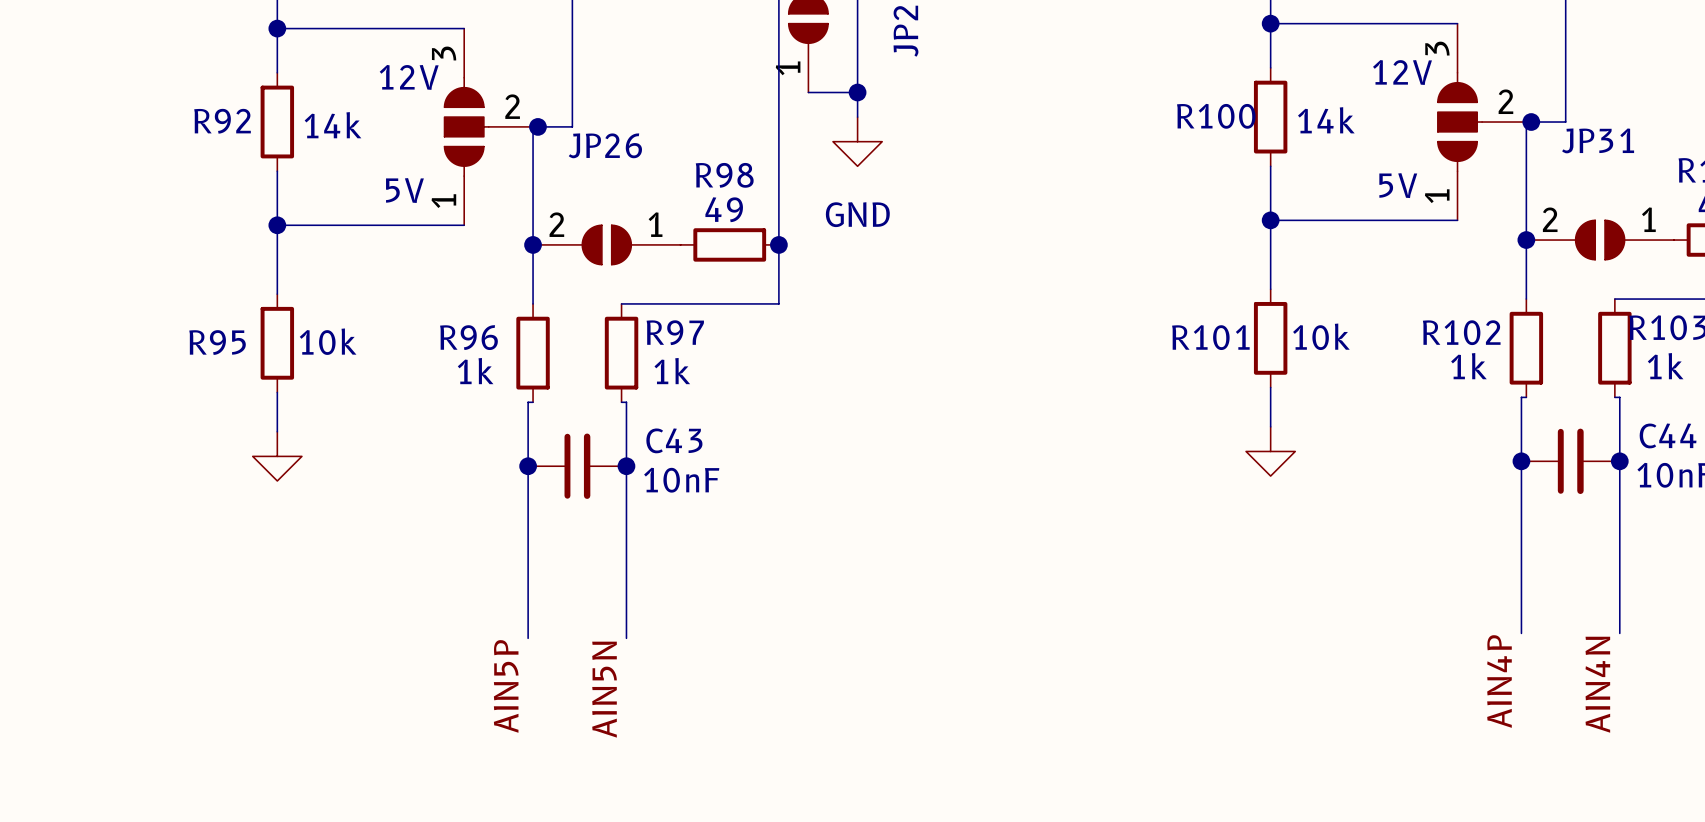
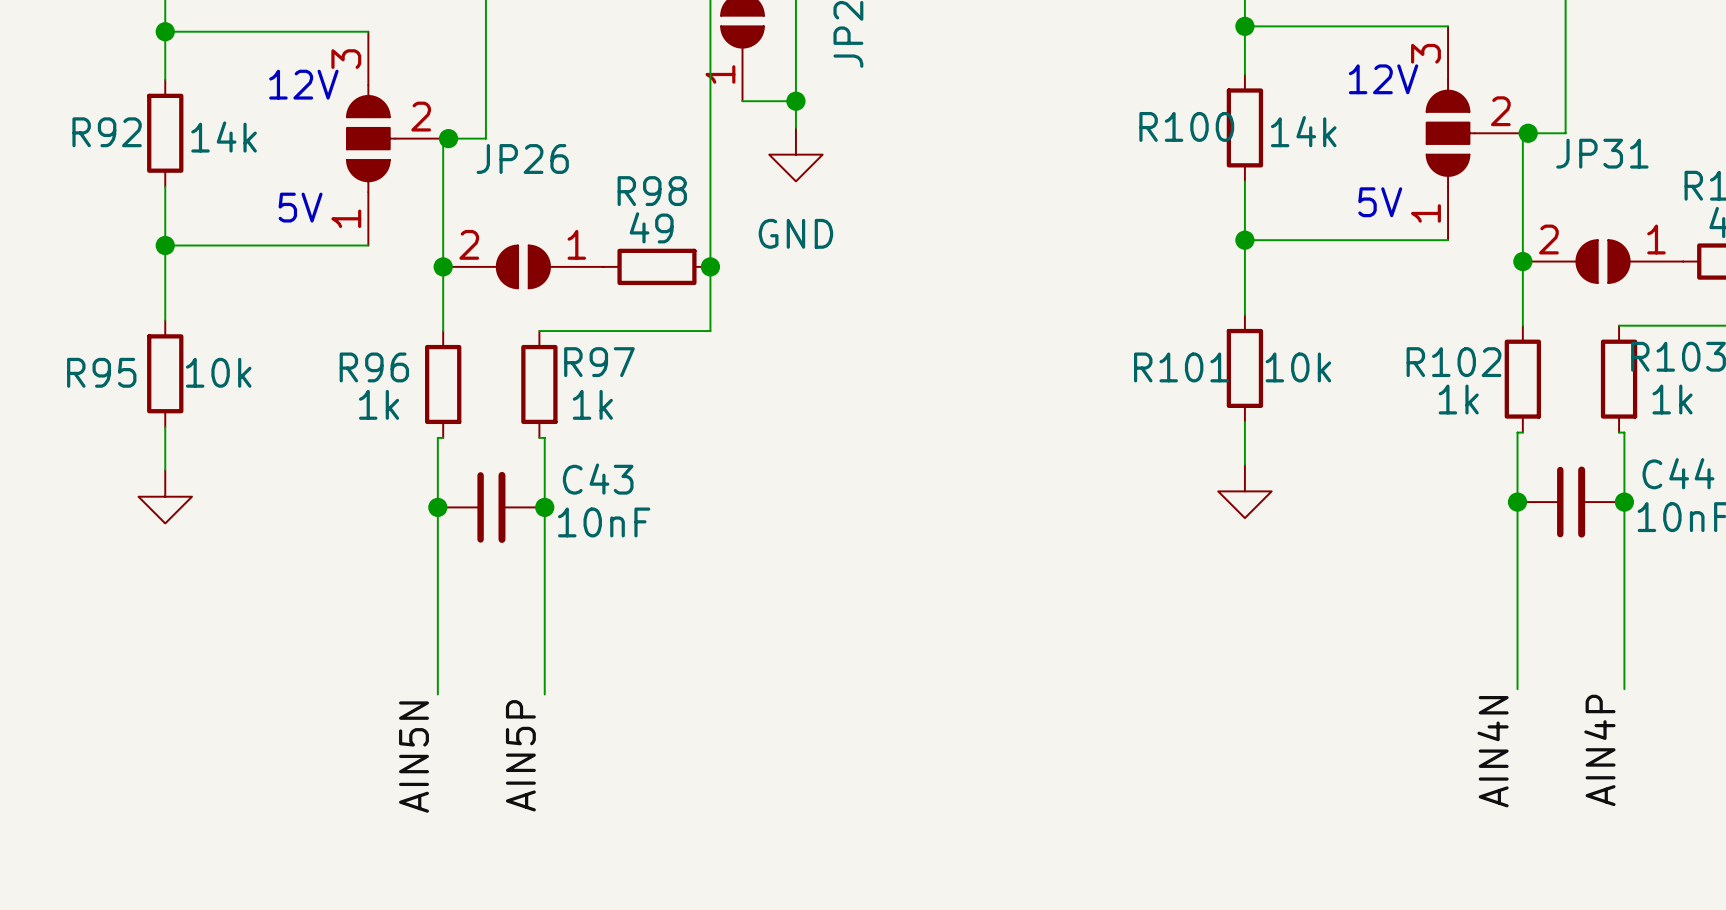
label: AIN4P (1499, 681) -> AIN4N (1493, 751)
label: AIN4N (1597, 684) -> AIN4P (1599, 750)
label: AIN5P (506, 686) -> AIN5N (413, 757)
label: AIN5N (604, 689) -> AIN5P (520, 755)

